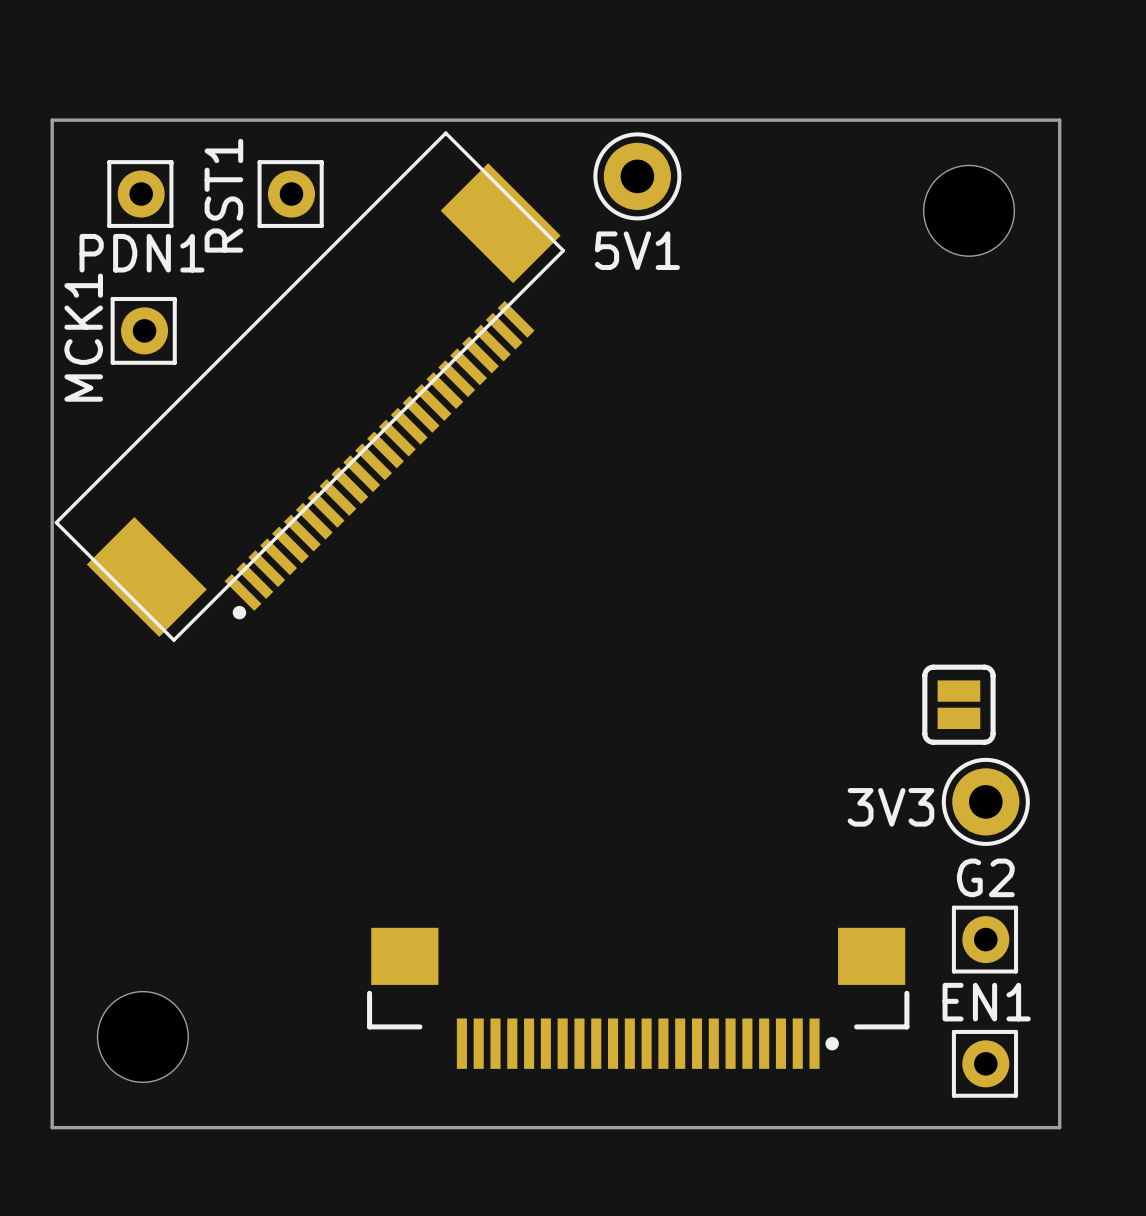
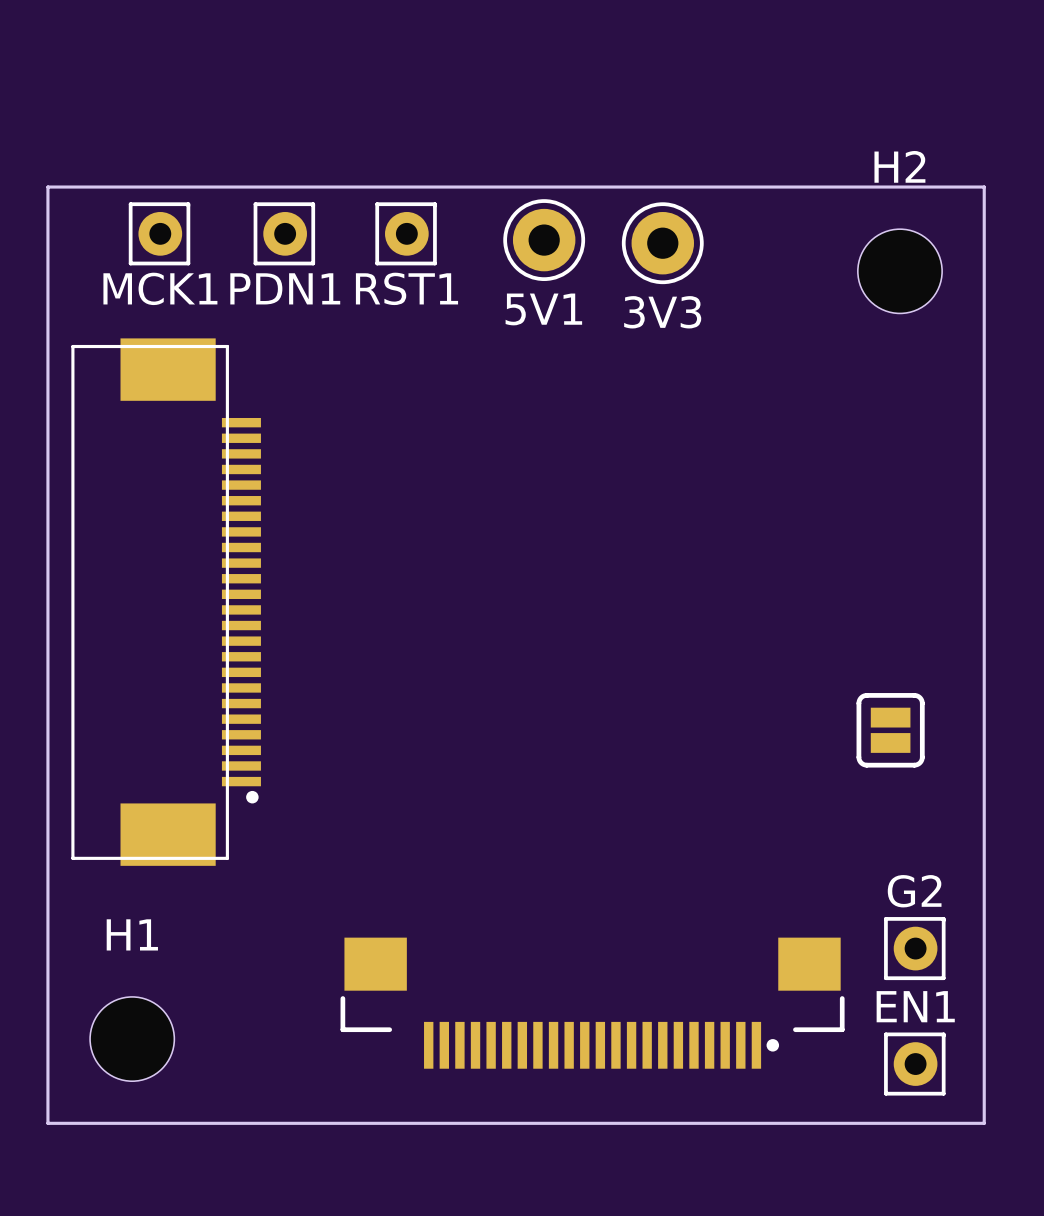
H2 name: none -> H2 (899, 166)
5V1 position: (637, 176) -> (544, 240)
PDN1 position: (140, 194) -> (284, 233)
RST1 position: (290, 194) -> (406, 233)
RST1 name rotation: 0° (223, 195) -> 90° clockwise (406, 288)
MCK1 position: (143, 330) -> (159, 233)
MCK1 name rotation: 0° (83, 337) -> 90° clockwise (160, 288)
part: (309, 386) -> none
part: none -> (166, 602)
3V3 position: (985, 801) -> (662, 243)
3V3 name position: 3V3 (890, 807) -> 3V3 (662, 312)
H1 name: none -> H1 (132, 934)

